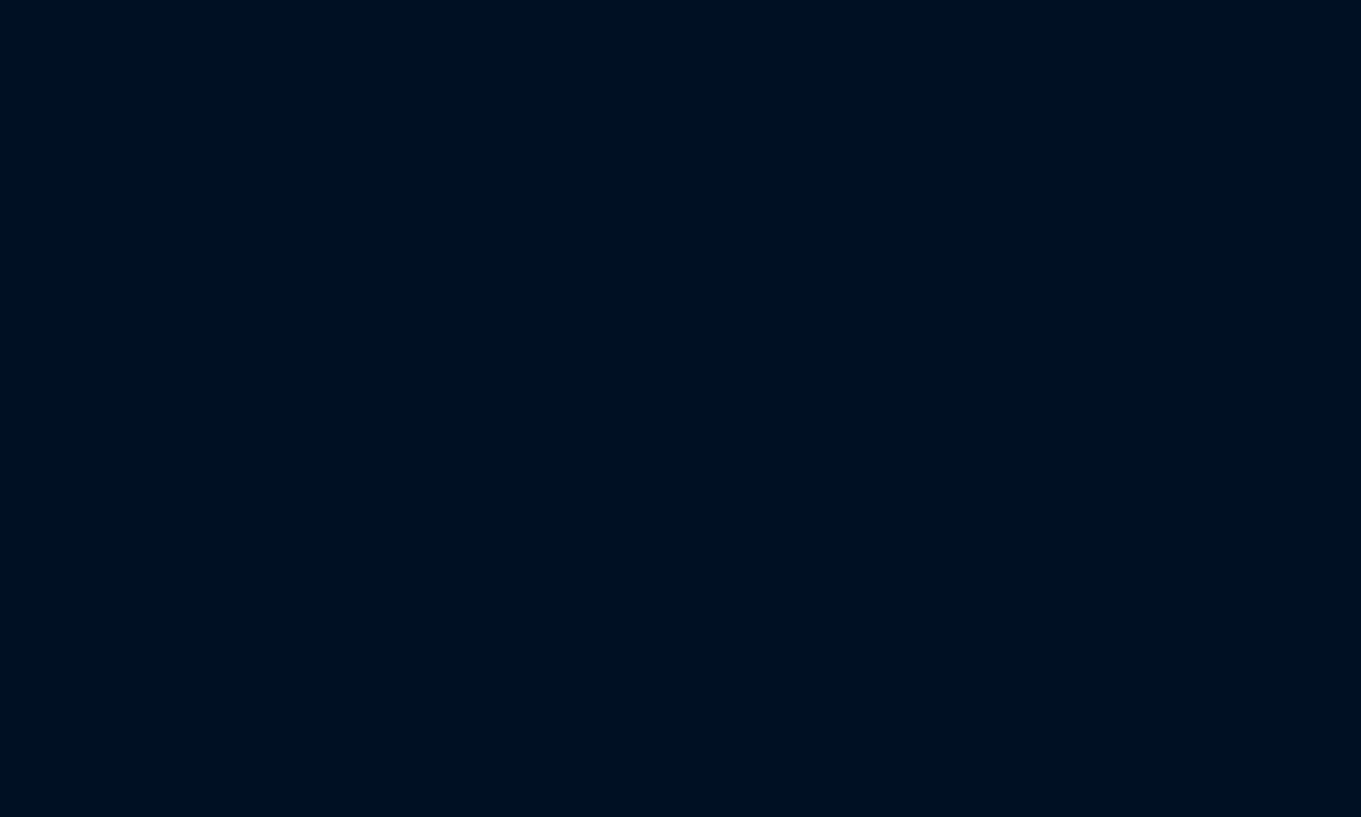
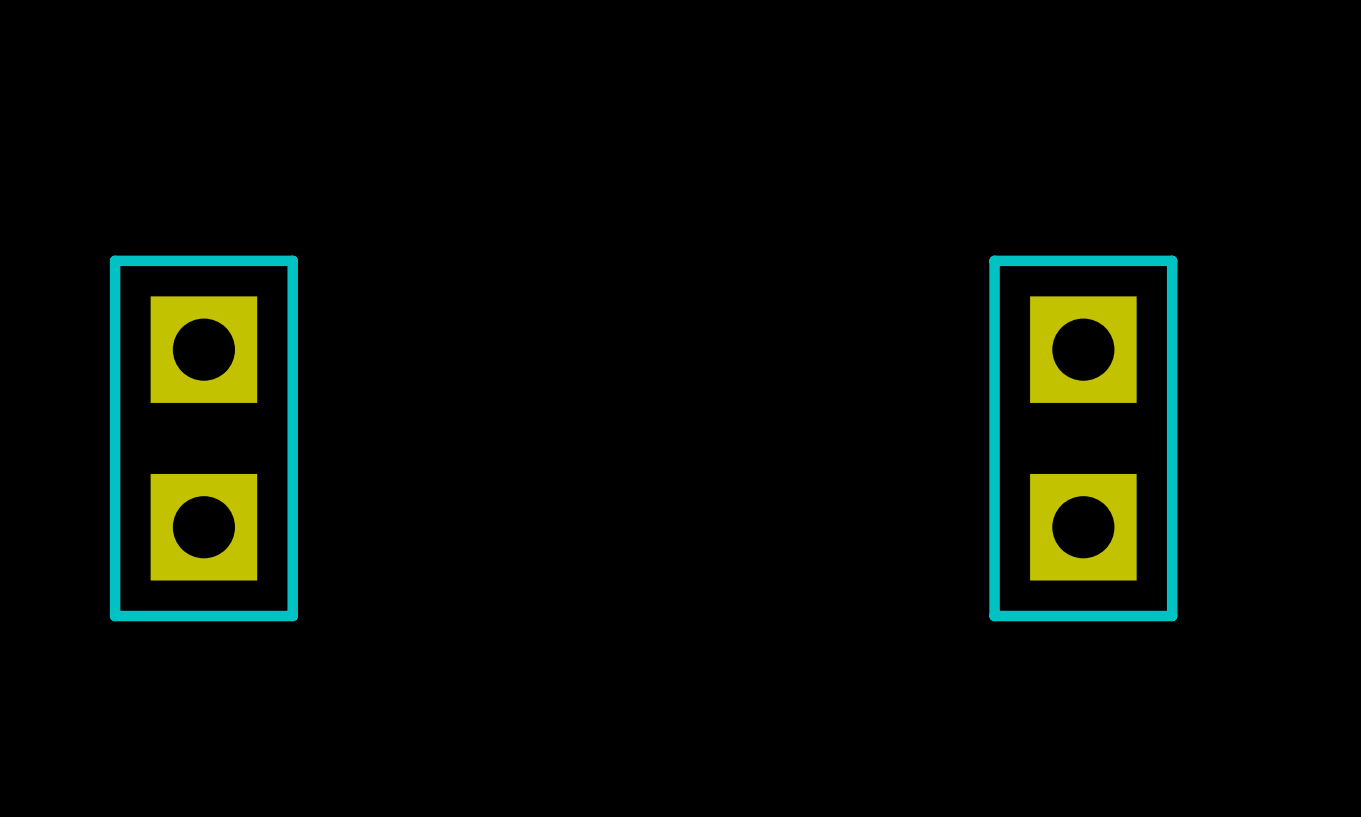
part: none -> (203, 438)
part: none -> (1083, 438)

